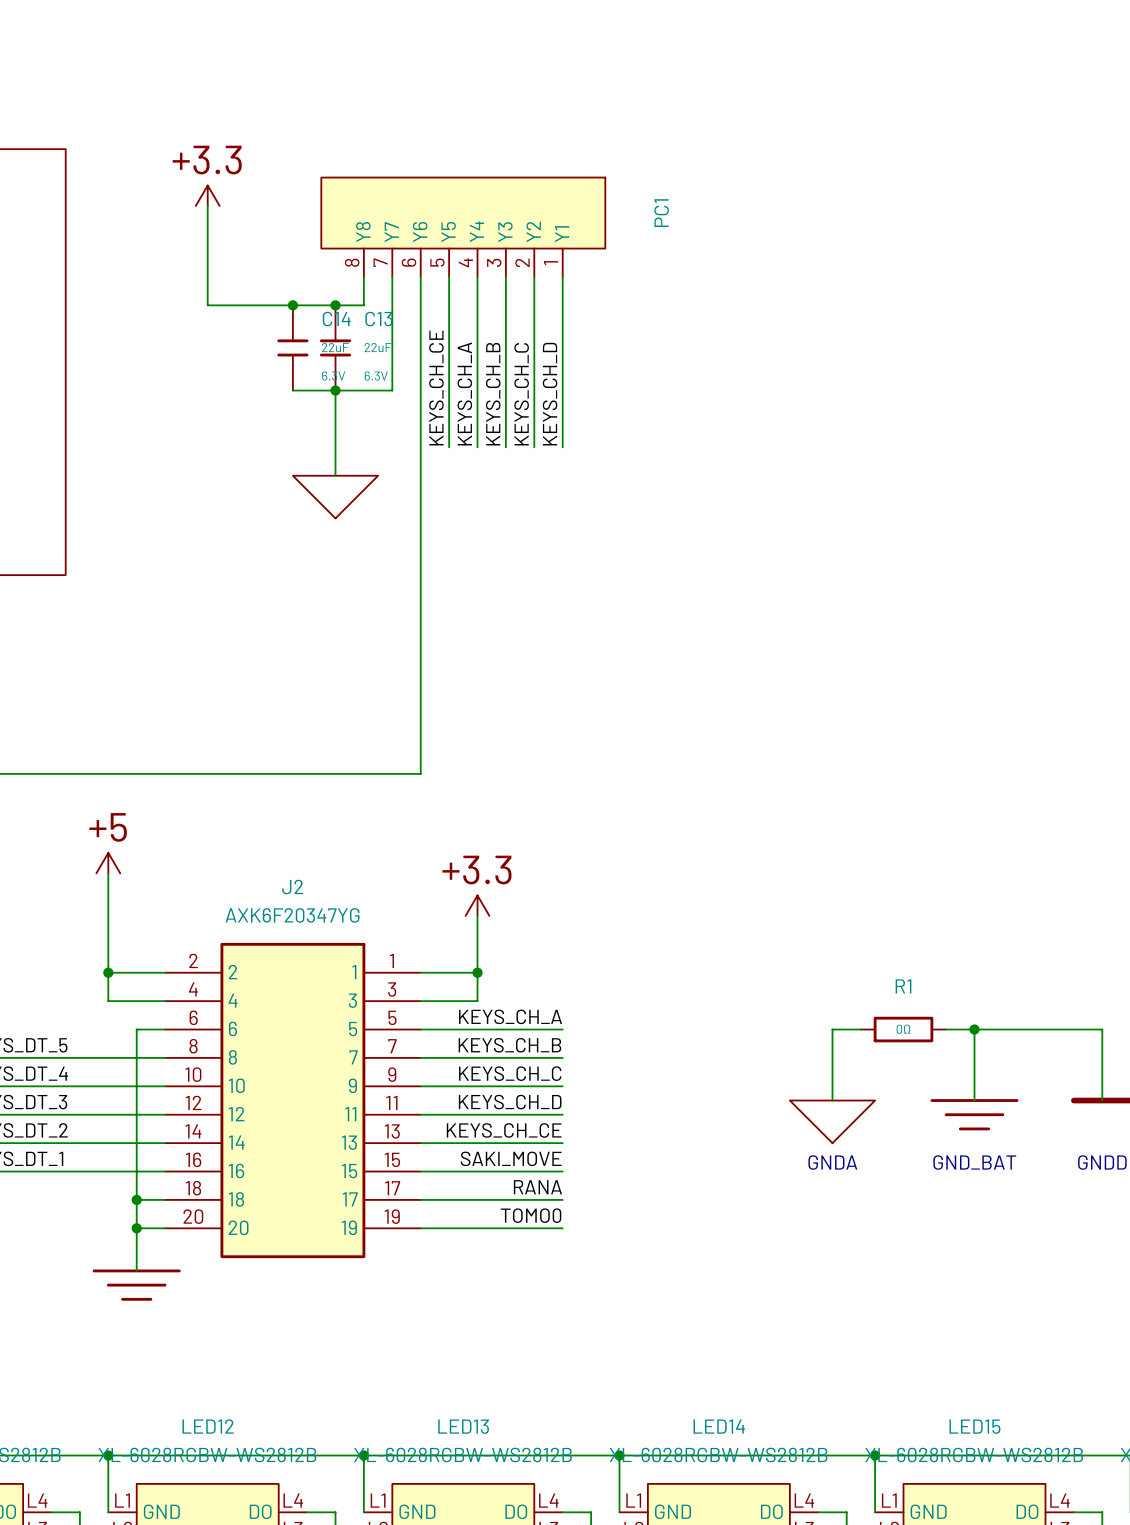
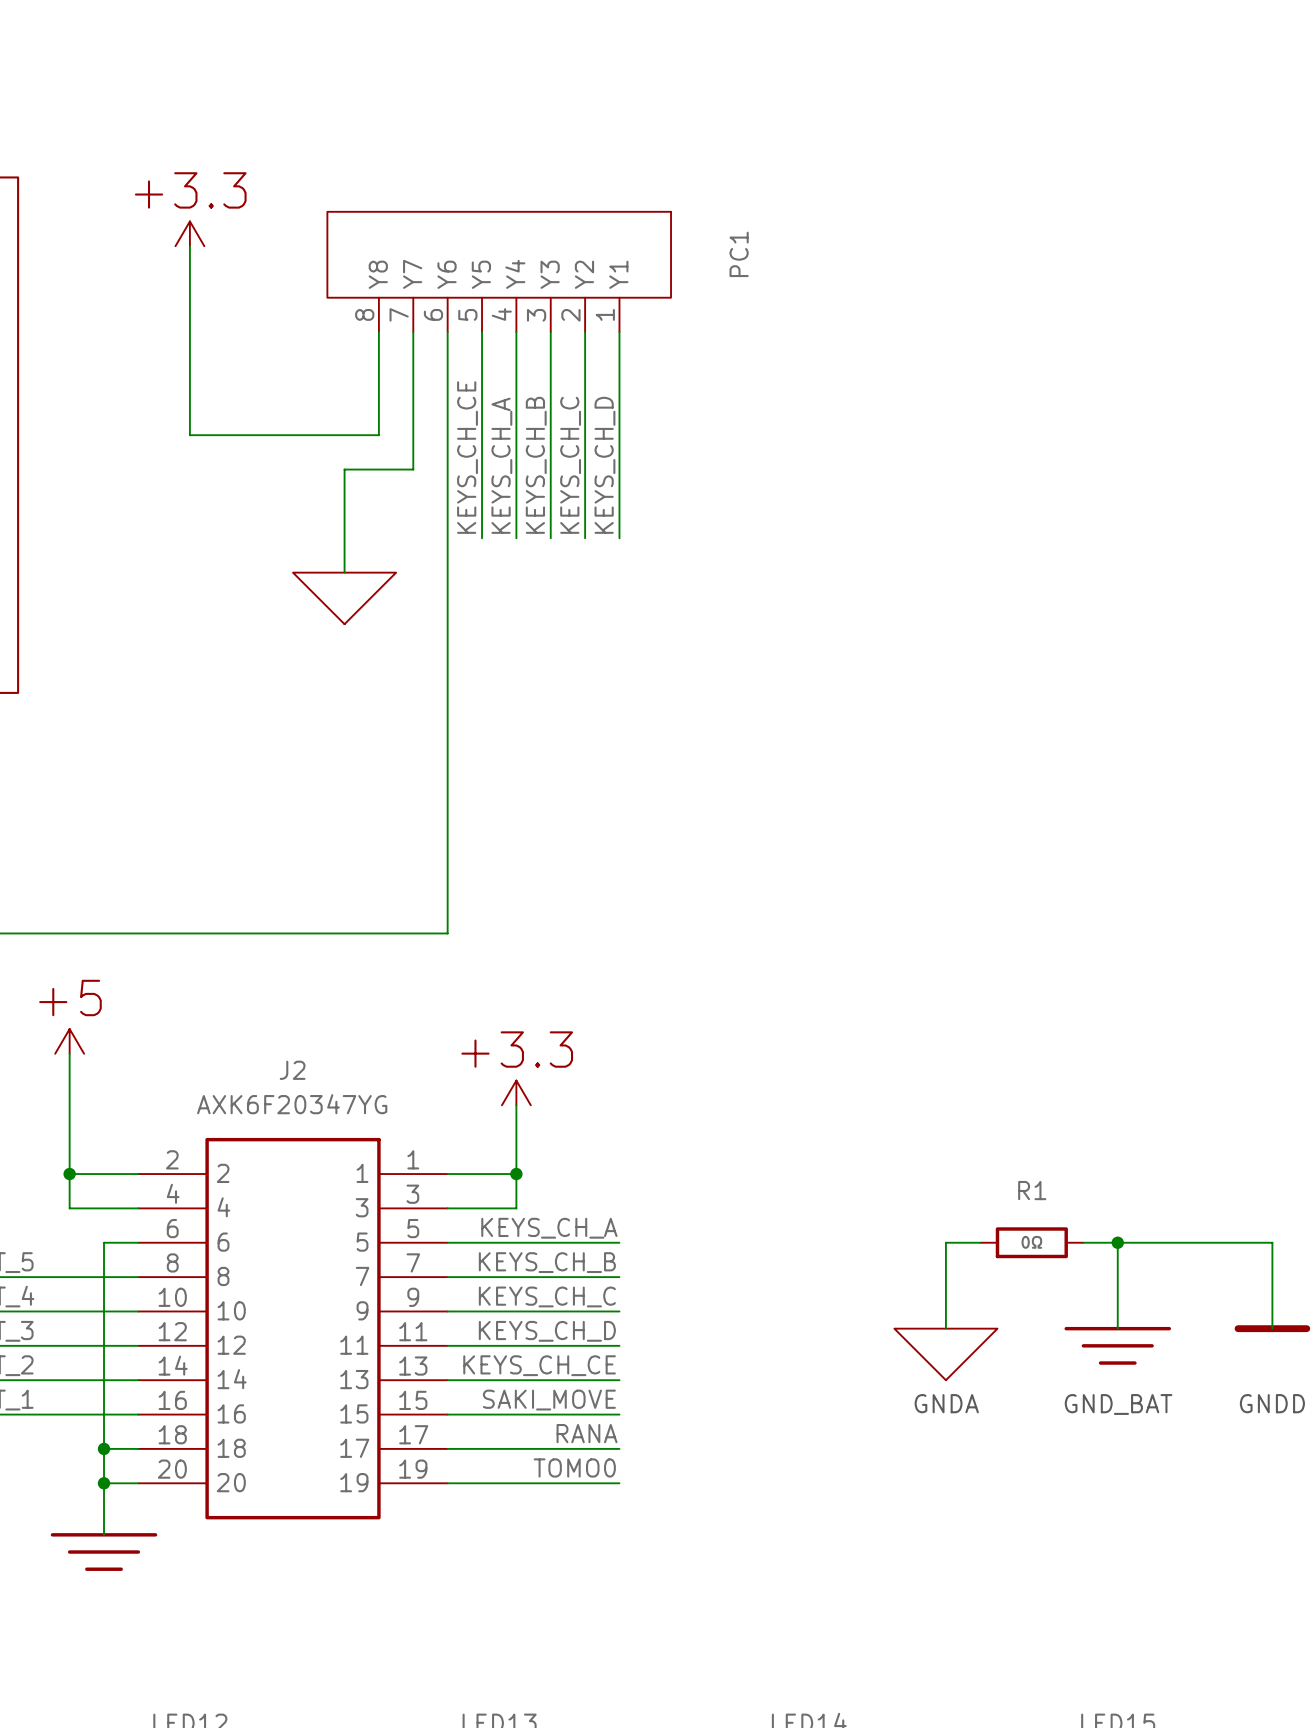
wire: (207, 305) (363, 305) -> (189, 366) (189, 435) (378, 435) (378, 366)
junction: (292, 305) -> none
junction: (335, 305) -> none
C14: 22uF (292, 347) -> none
C13: 22uF (335, 347) -> none
wire: (292, 390) (335, 390) -> none
junction: (335, 390) -> none

